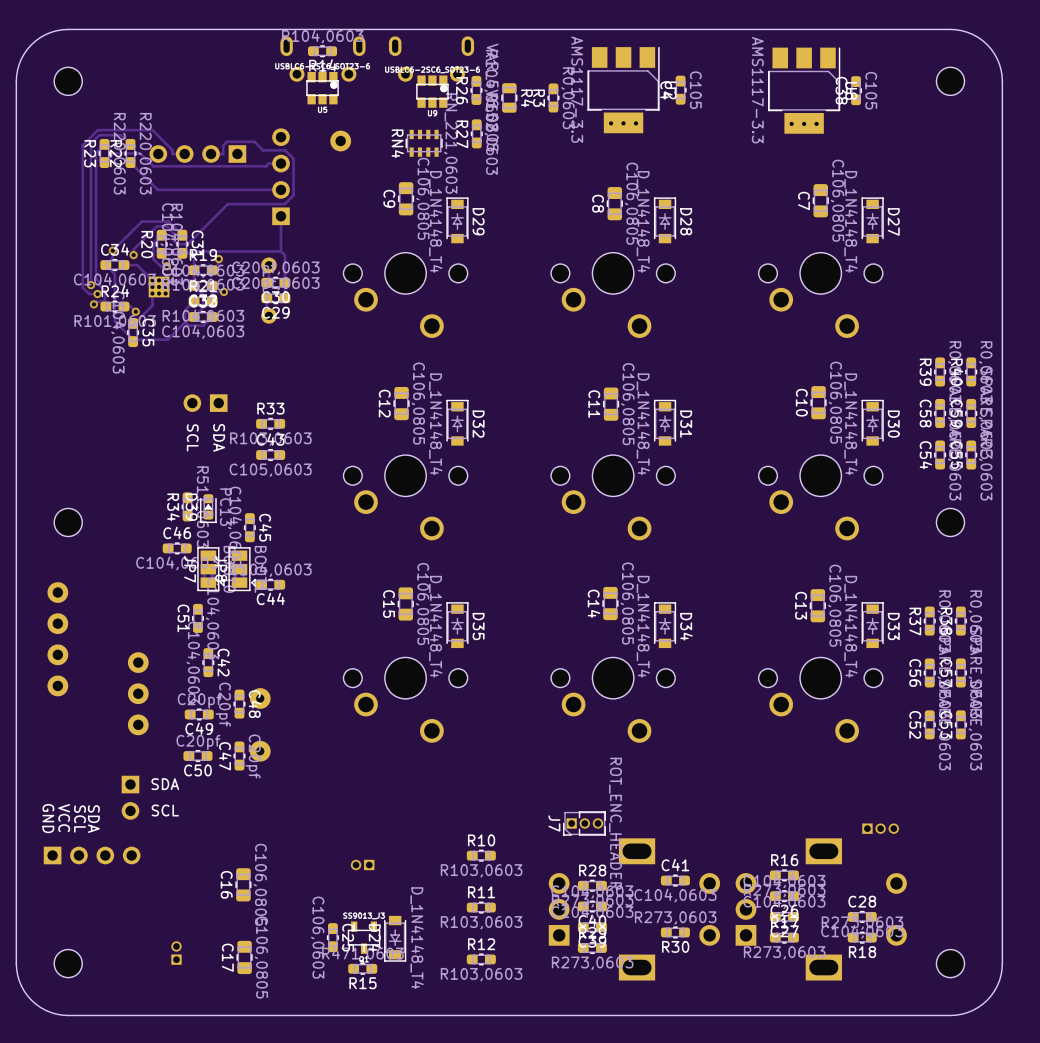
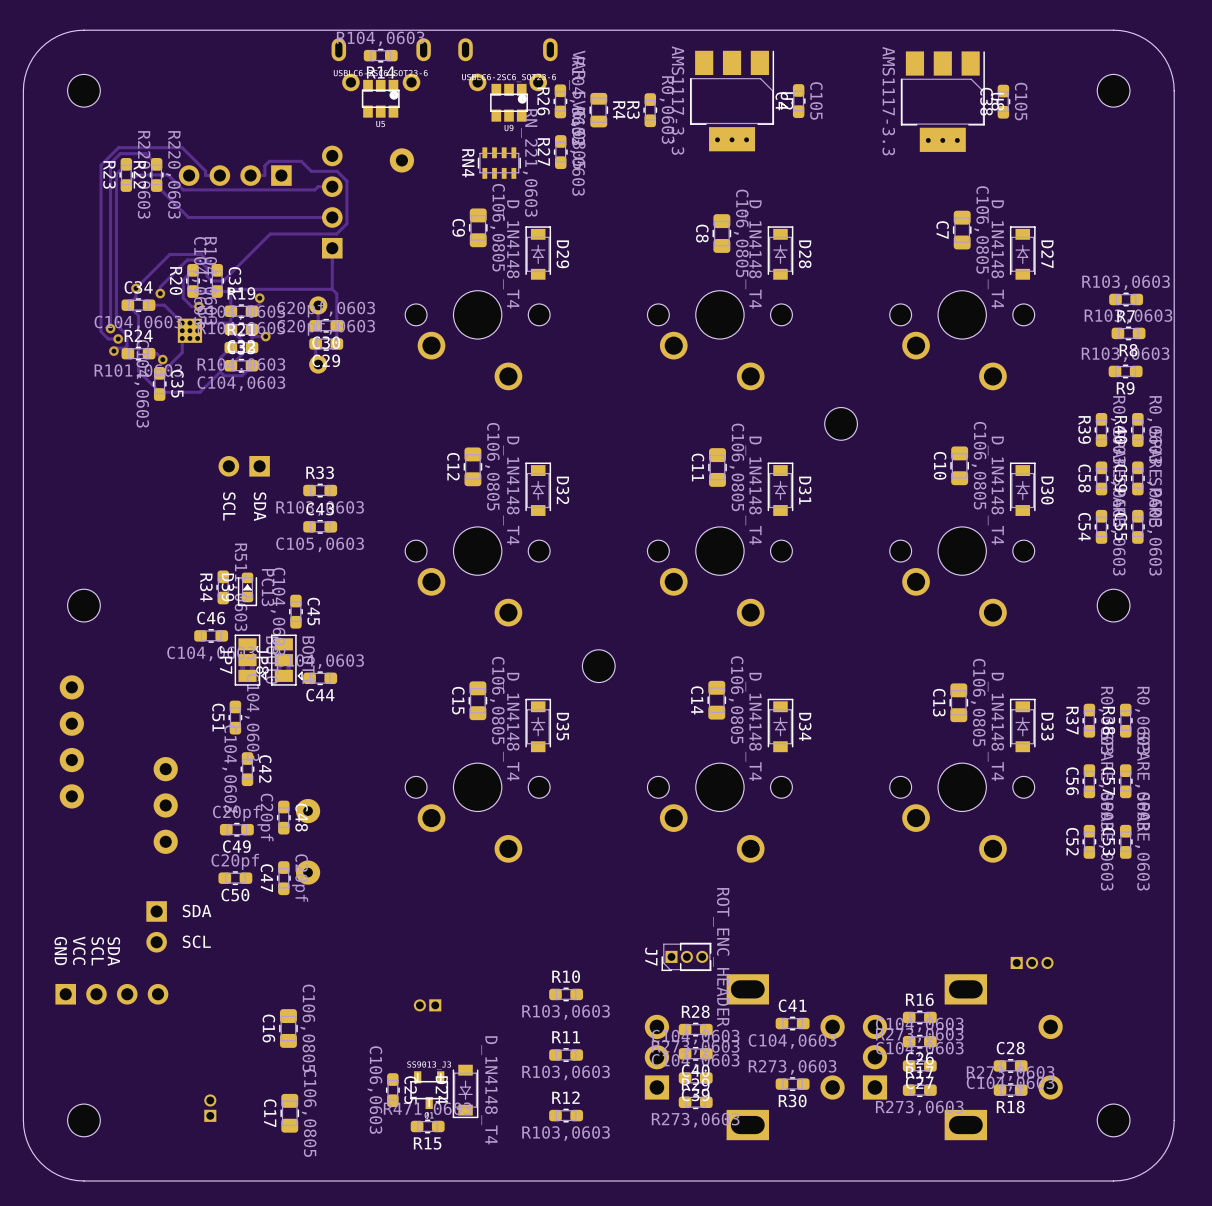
R7: none -> R103,0603 (1126, 299)
R8: none -> R103,0603 (1128, 333)
R9: none -> R103,0603 (1125, 371)
part: none -> (841, 423)
part: none -> (598, 666)

